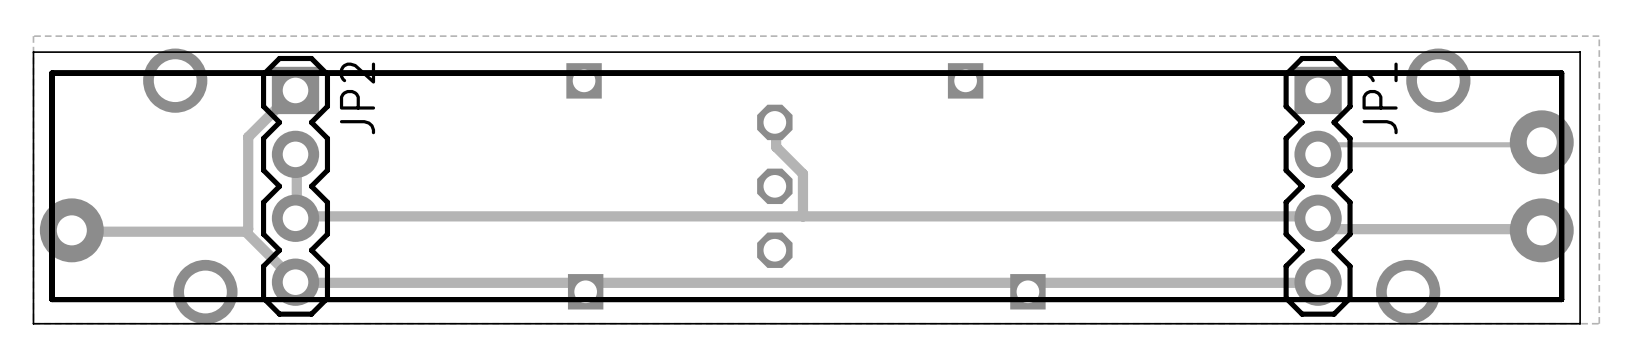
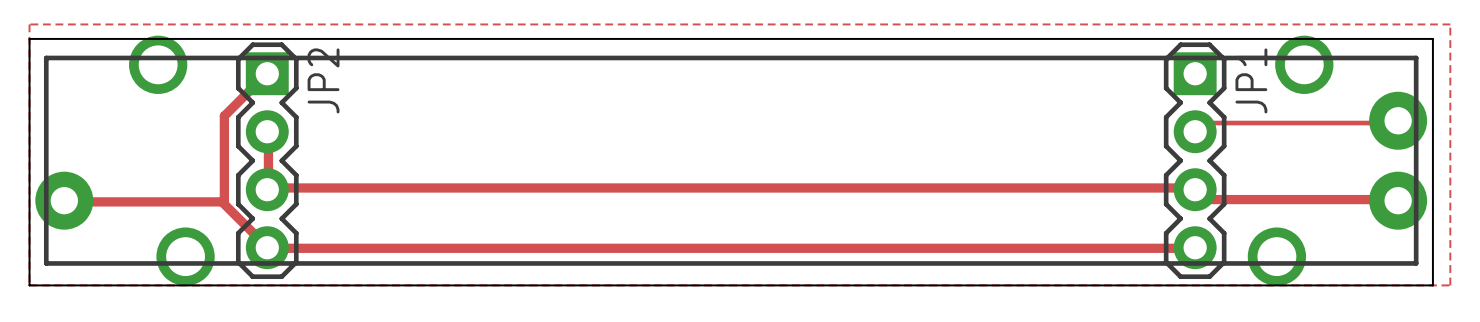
track: (774, 122) (776, 147) (802, 173) (802, 216) -> none
part: (806, 186) -> none

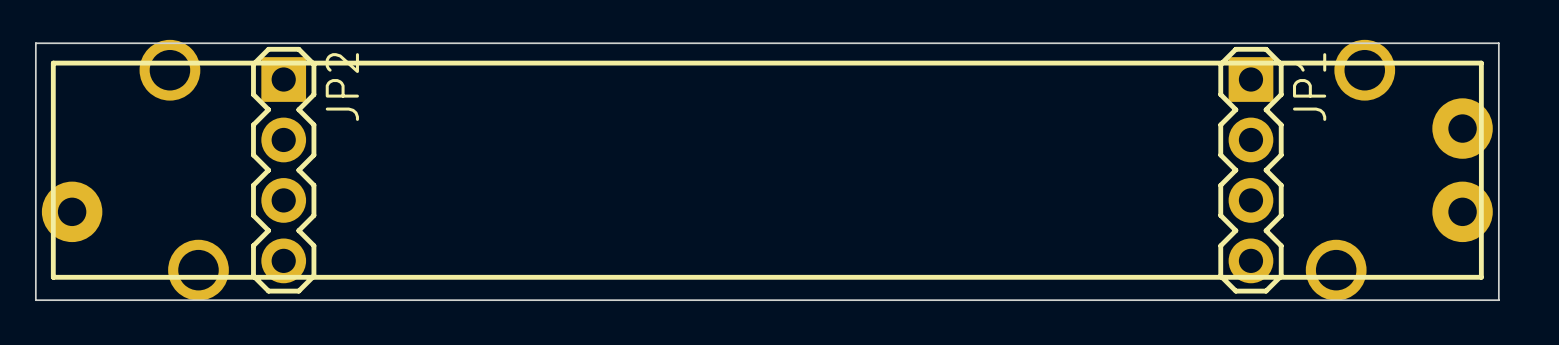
zone outline: (29, 24) (1450, 24) (1450, 285) (29, 285) (29, 24) -> none
track: (267, 73) (224, 116) (224, 199) (222, 201) -> none
track: (1398, 120) (1398, 123) (1203, 123) (1195, 131) -> none
track: (267, 131) (267, 189) (273, 187) (1191, 187) (1205, 199) (1398, 200) -> none
track: (64, 200) (222, 201) -> none
track: (222, 201) (267, 247) (270, 248) (1195, 247) -> none

